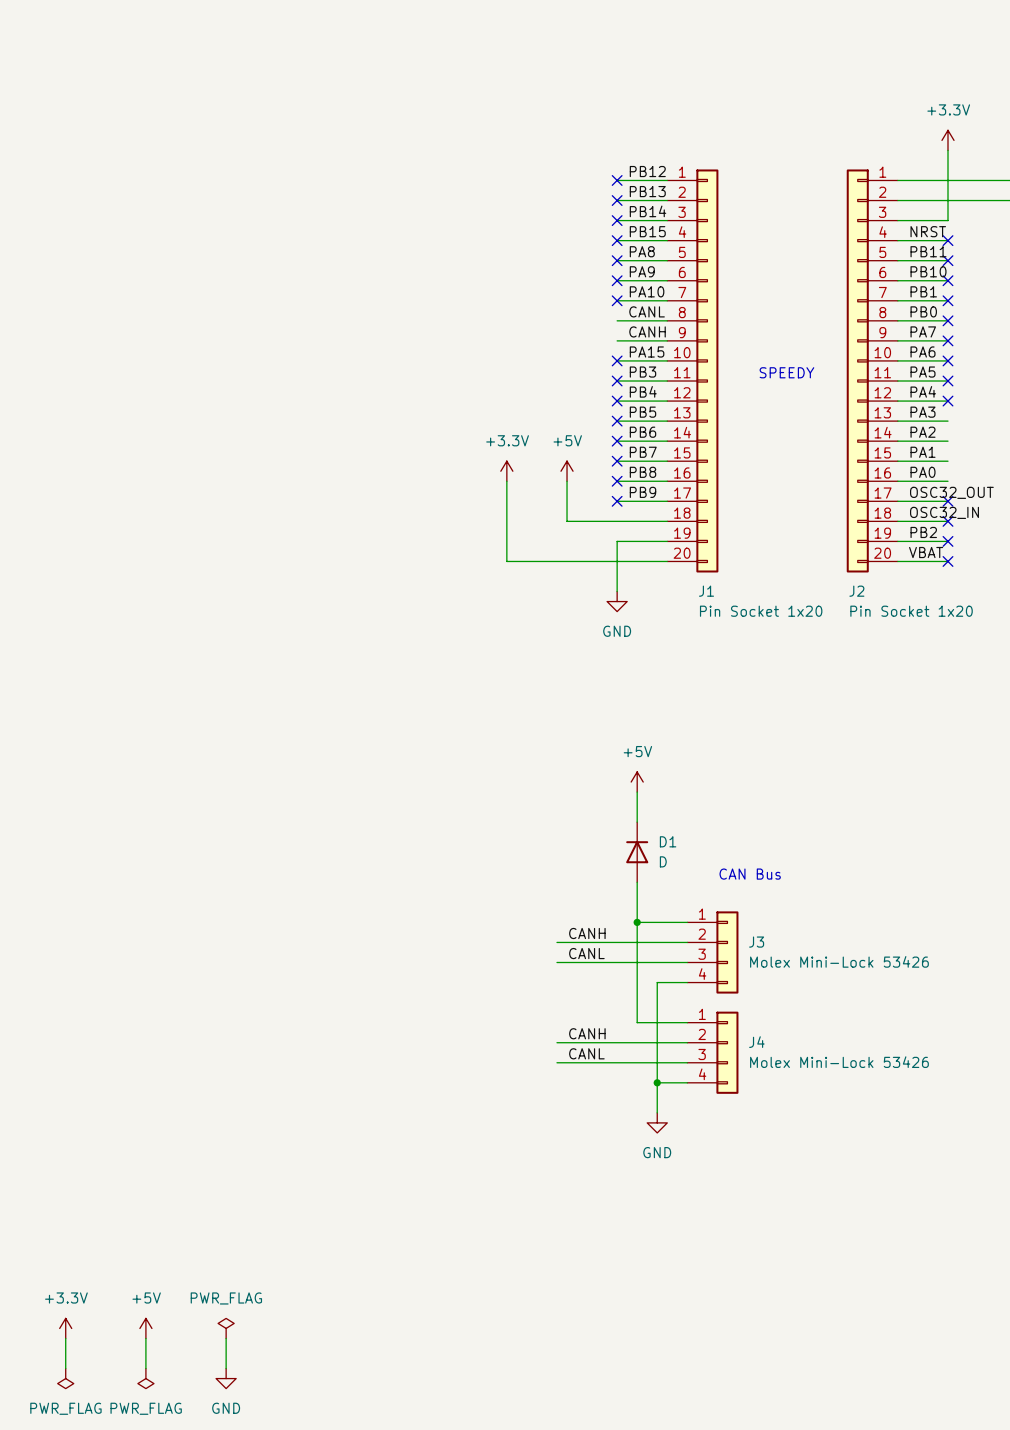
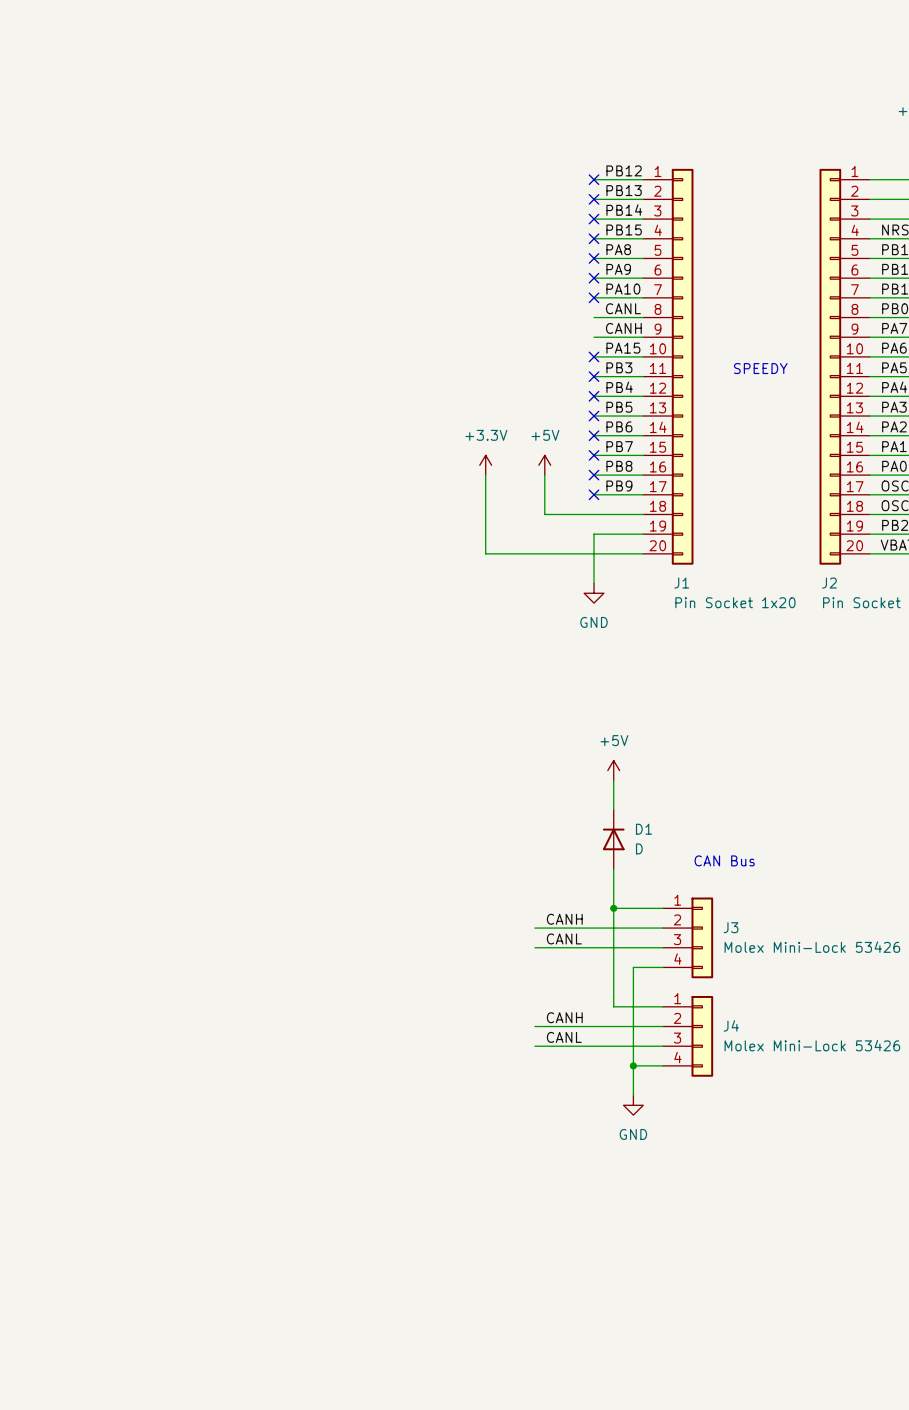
power symbol: +3.3V (65, 1328) -> none
power symbol: +5V (145, 1328) -> none
power symbol: PWR_FLAG (226, 1328) -> none
wire: (65, 1338) (65, 1368) -> none
wire: (145, 1338) (145, 1368) -> none
wire: (226, 1338) (226, 1368) -> none
power symbol: PWR_FLAG (65, 1378) -> none
power symbol: PWR_FLAG (145, 1378) -> none
power symbol: GND (226, 1378) -> none

